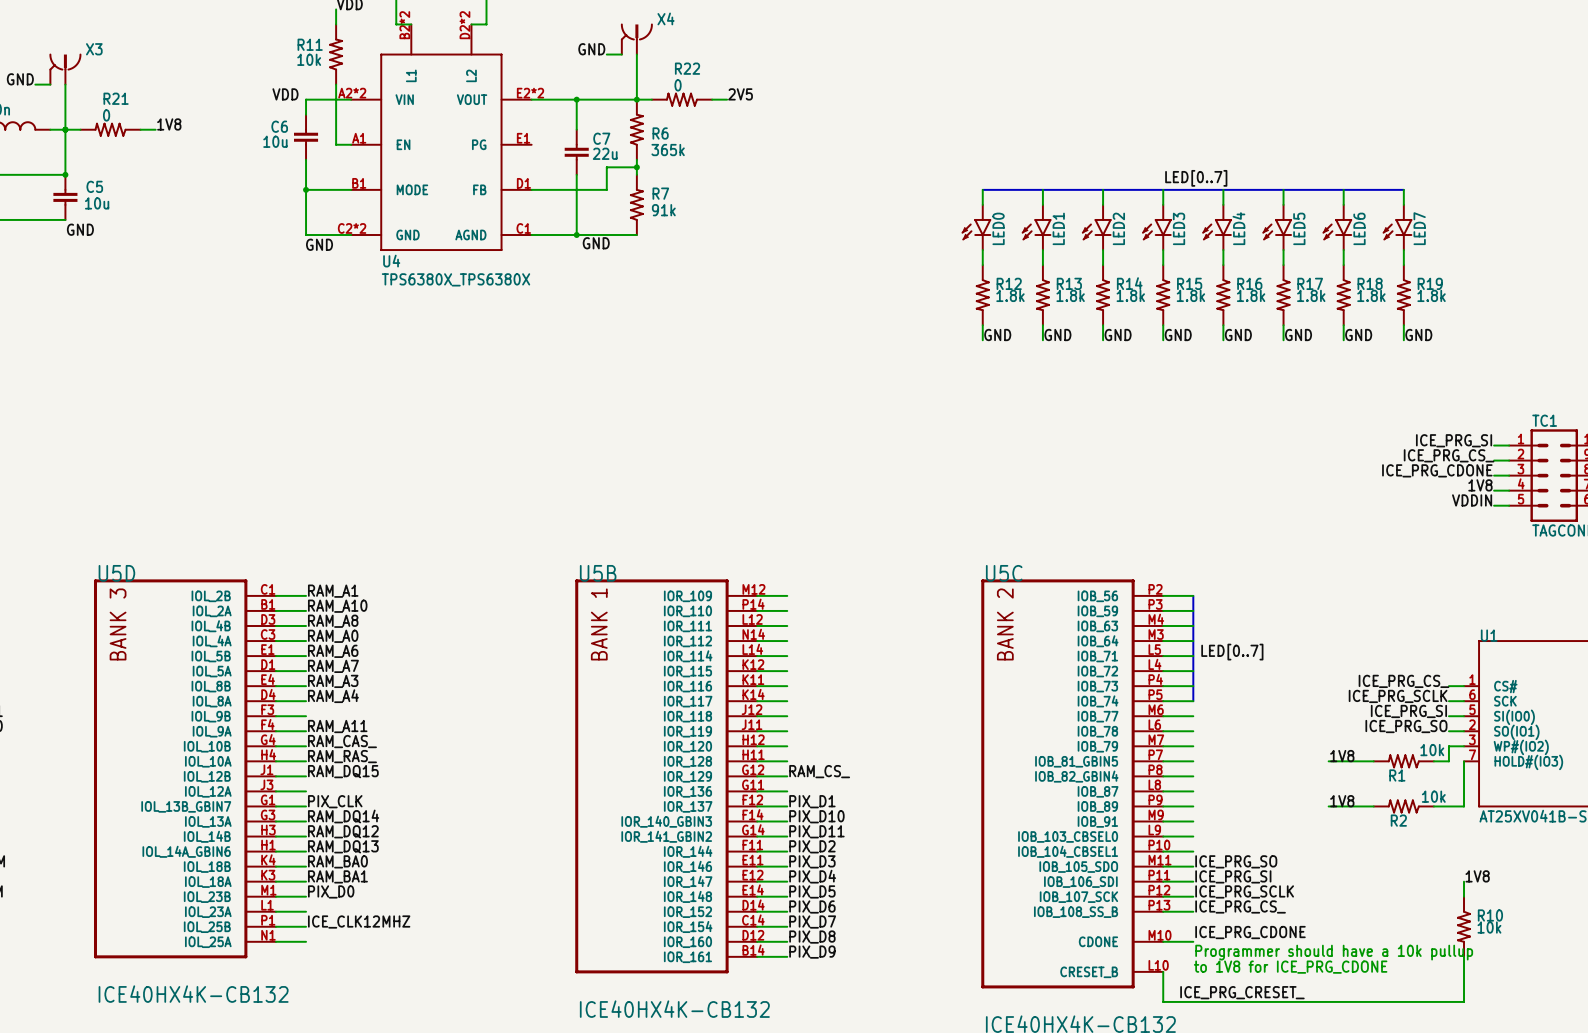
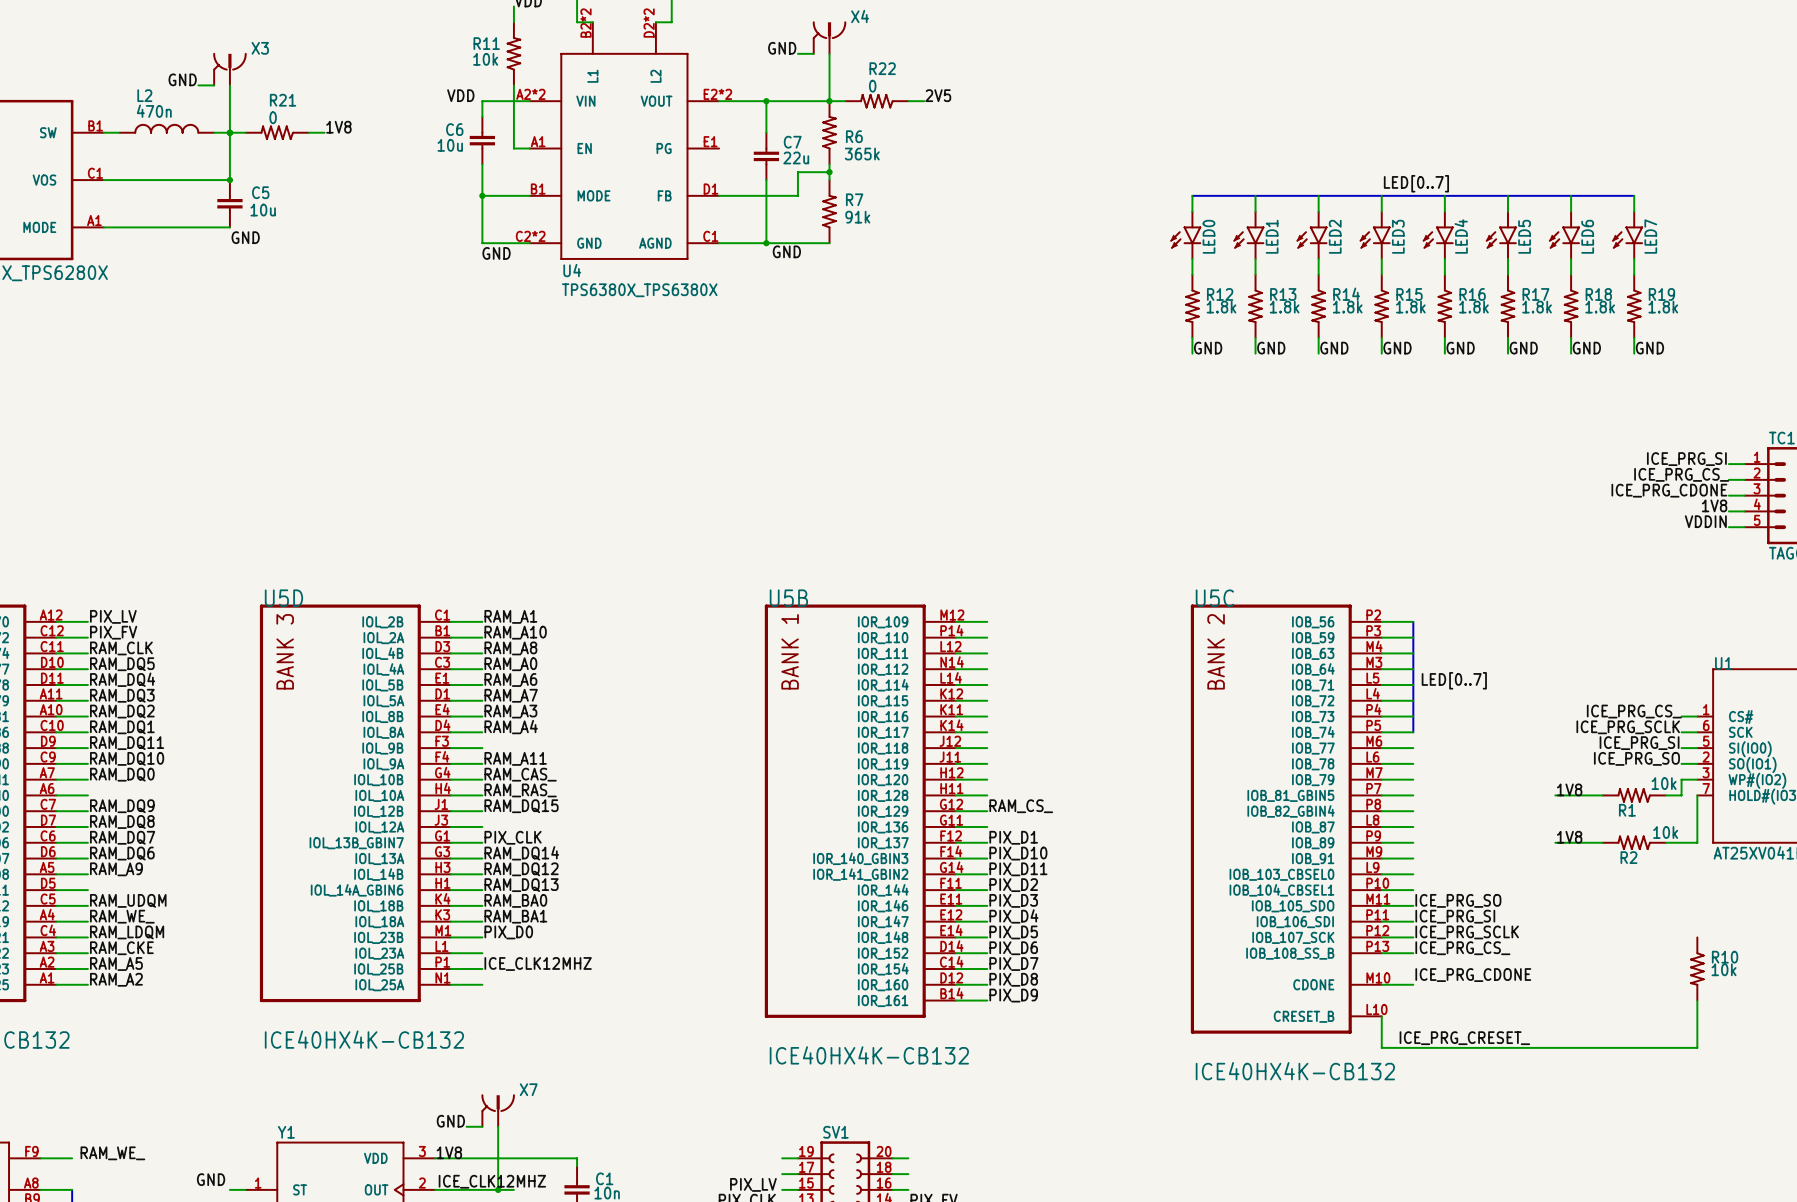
label: 1V8 (1477, 876) -> none
wire: (1464, 881) (1464, 896) -> none
text: Programmer should have a 10k pullup (1334, 952) -> none
text: to 1V8 for ICE_PRG_CDONE (1290, 967) -> none

